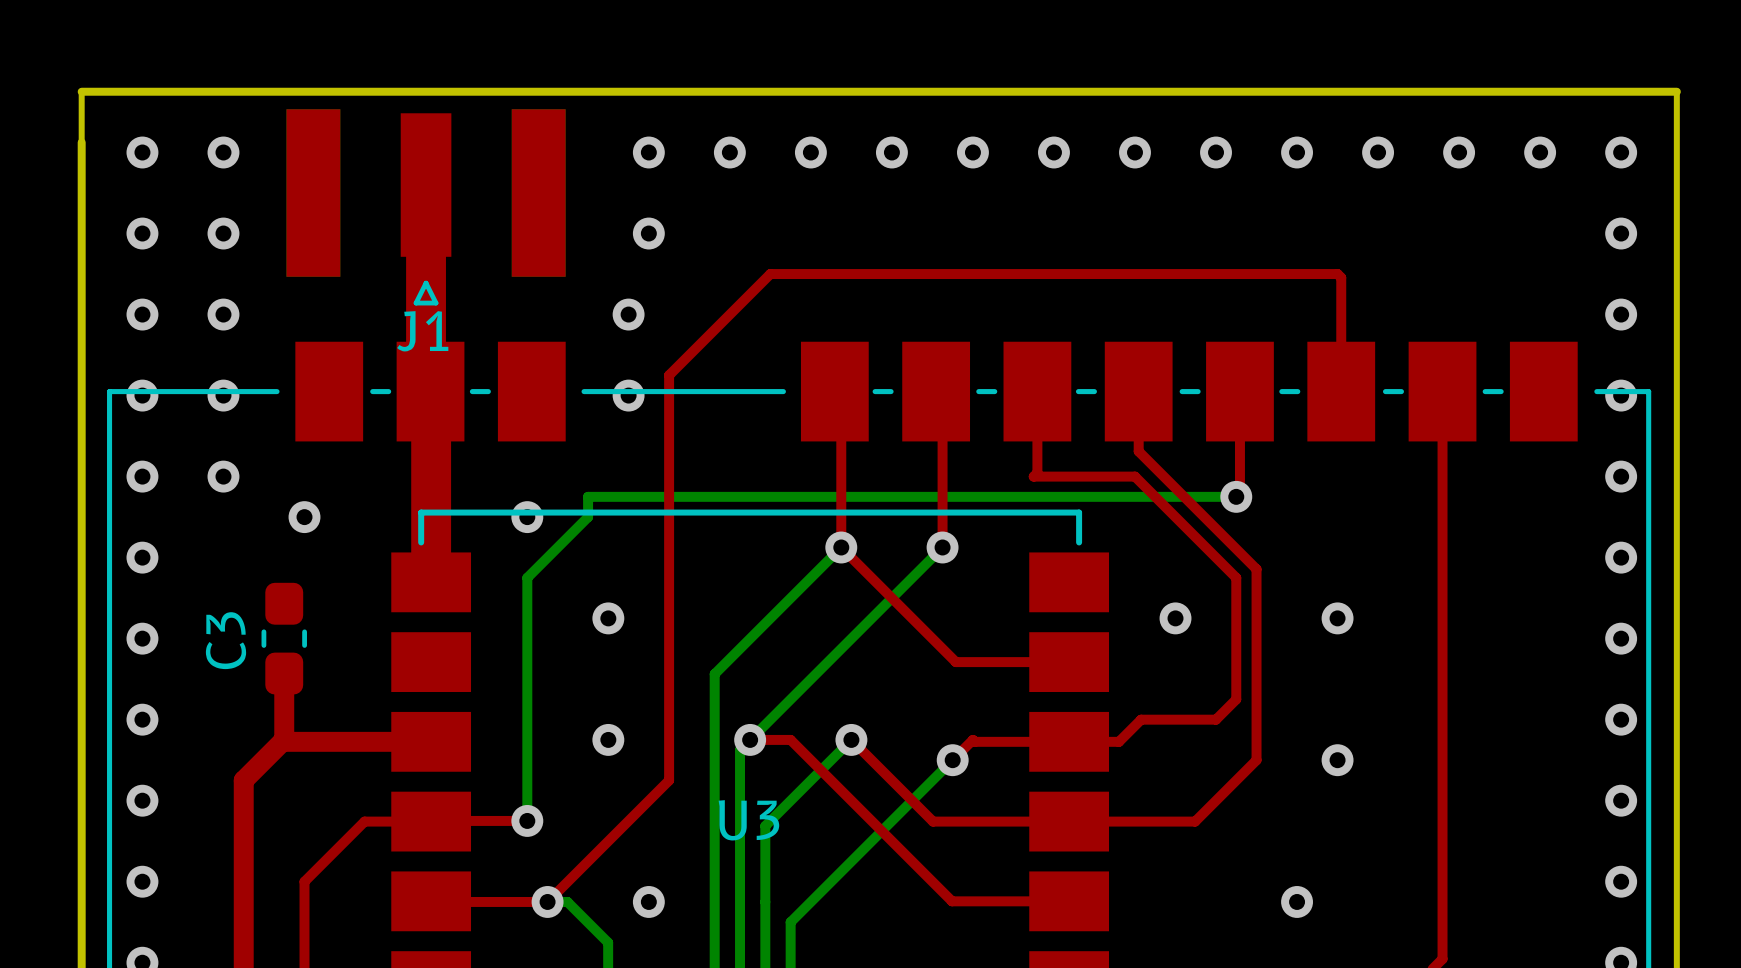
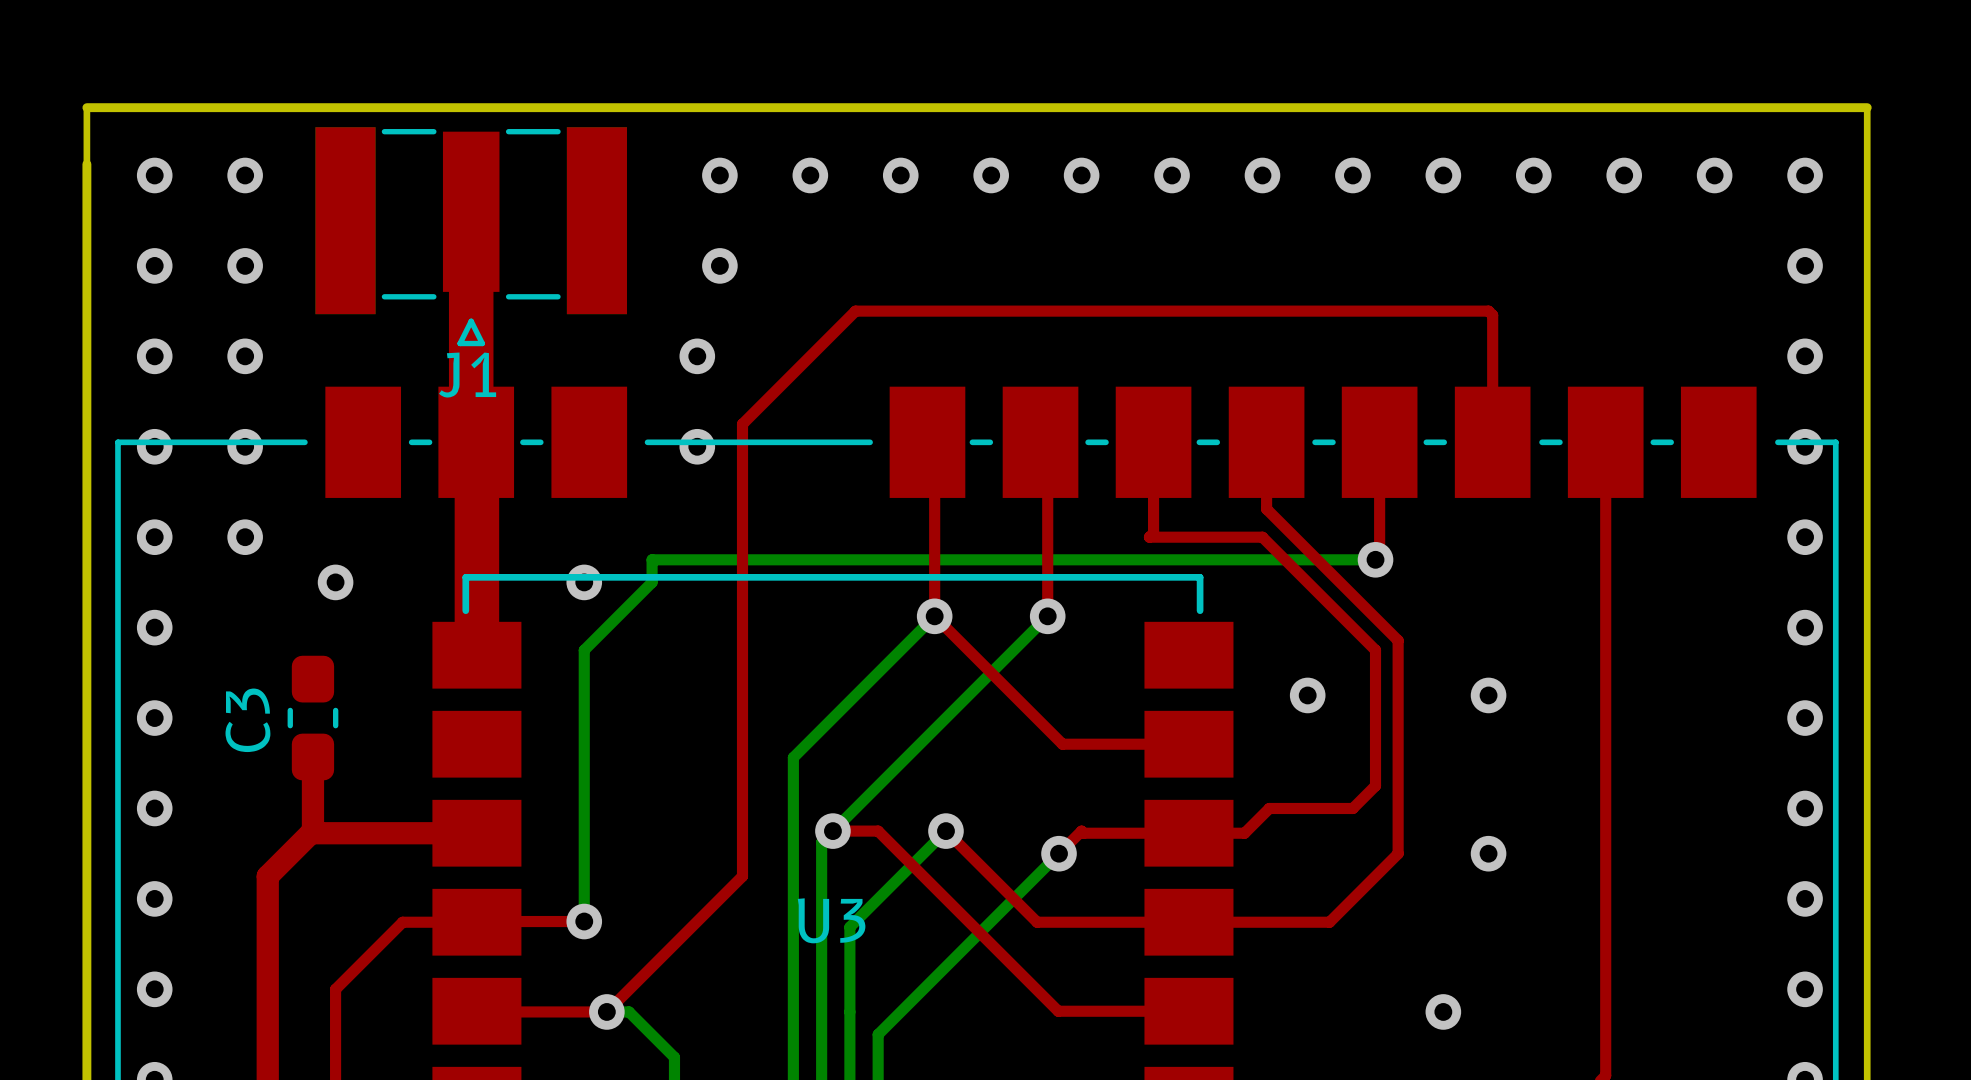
J1 footprint: [286, 109, 566, 306] -> [315, 127, 627, 347]
via: (608, 618) -> none
via: (608, 739) -> none
via: (648, 901) -> none

